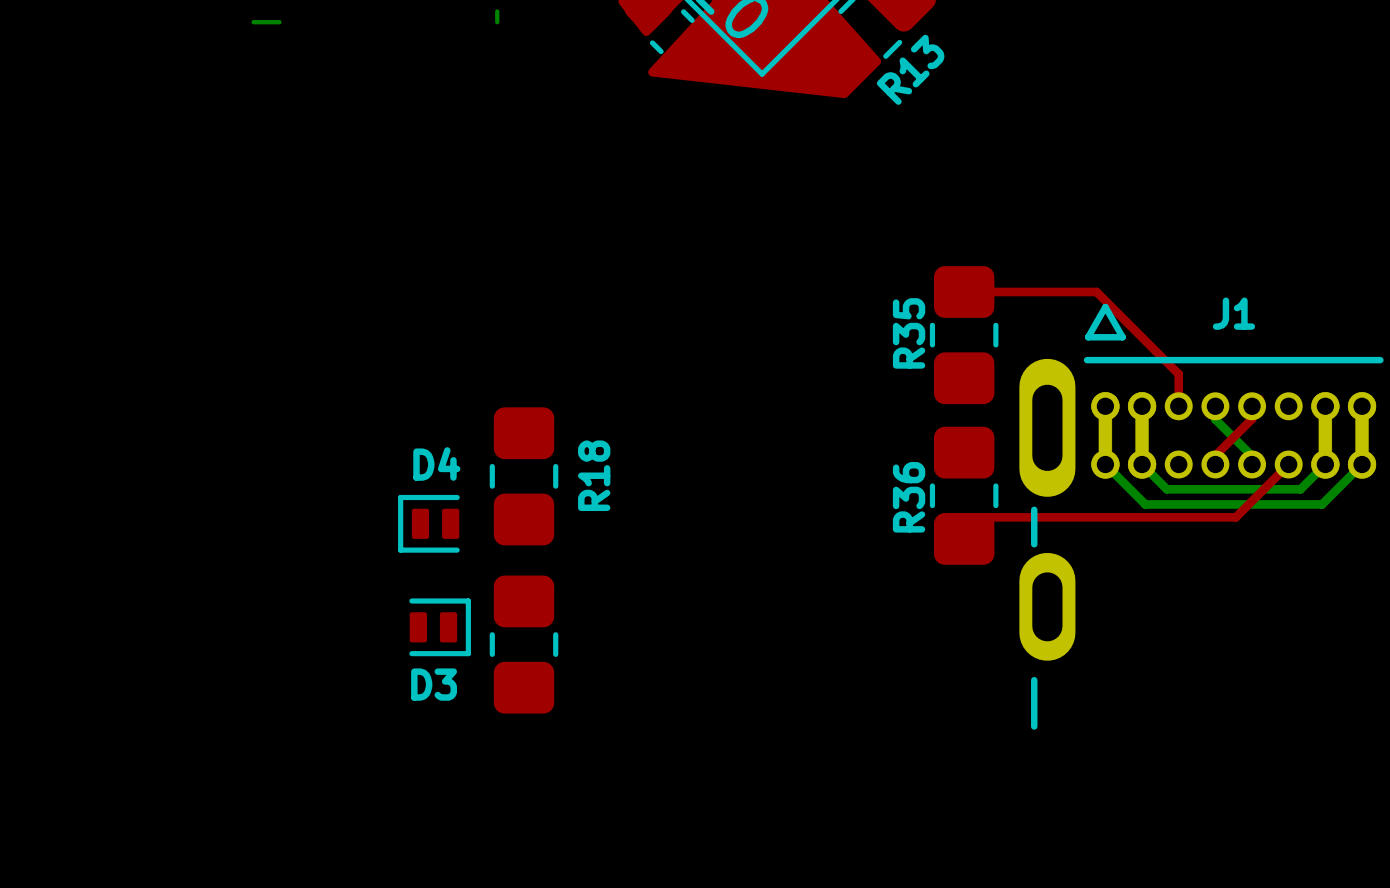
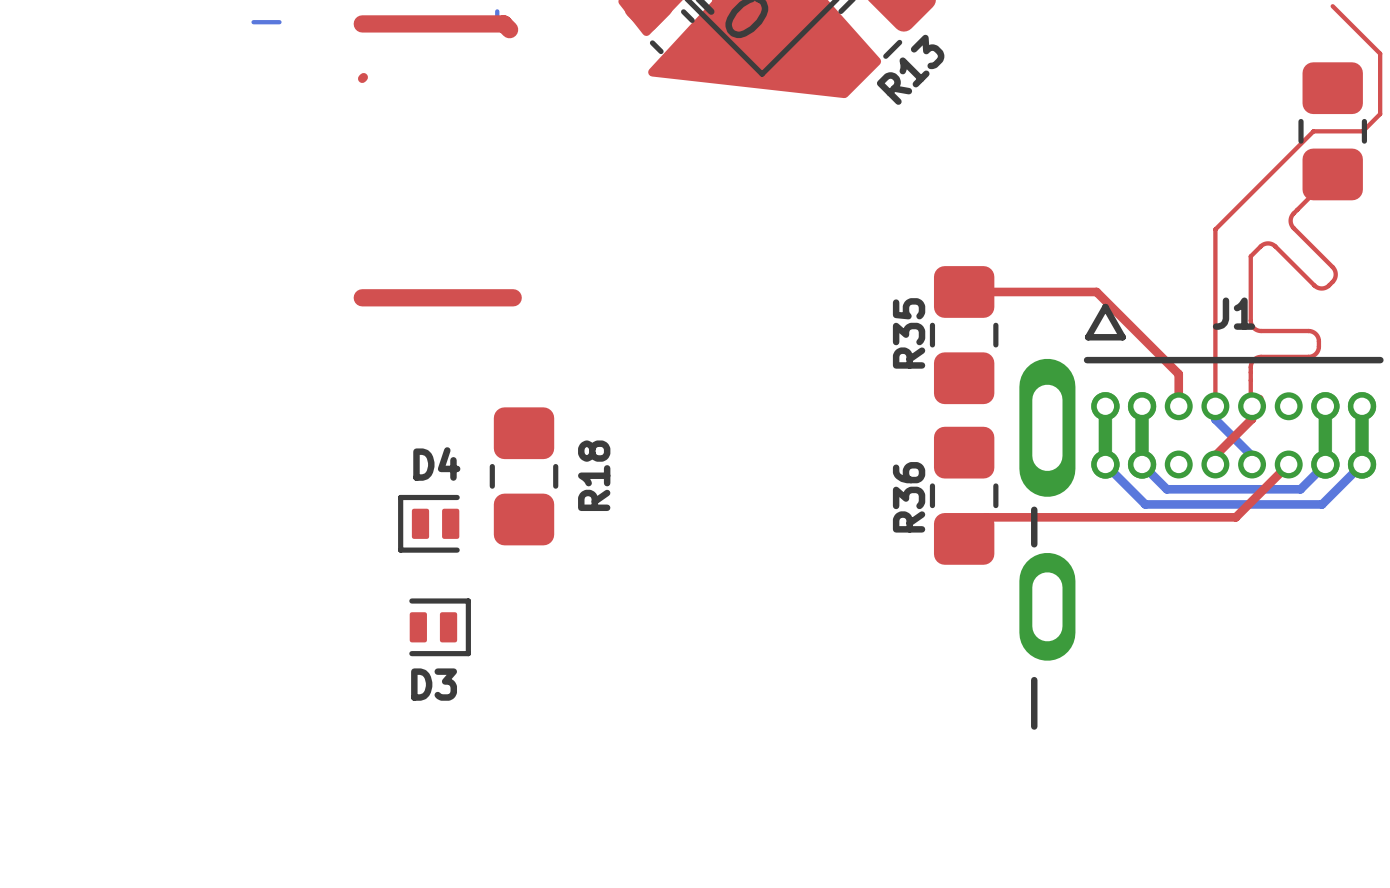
top track: none -> (1332, 6) (1380, 53) (1380, 114) (1362, 131) (1313, 131) (1215, 229) (1215, 406)
top track: none -> (362, 23) (503, 23) (509, 29)
top track: none -> (363, 77) (362, 78)
top track: none -> (1332, 174) (1293, 213) (1290, 220) (1293, 228) (1334, 268) (1335, 277) (1329, 285) (1321, 288) (1315, 286) (1272, 244) (1262, 244) (1250, 256) (1250, 320) (1253, 327) (1259, 330) (1310, 331) (1316, 334) (1318, 341) (1317, 351) (1310, 356) (1259, 356) (1253, 359) (1250, 366) (1250, 404)
top track: none -> (362, 297) (513, 297)
part position: (524, 644) -> (1332, 131)

